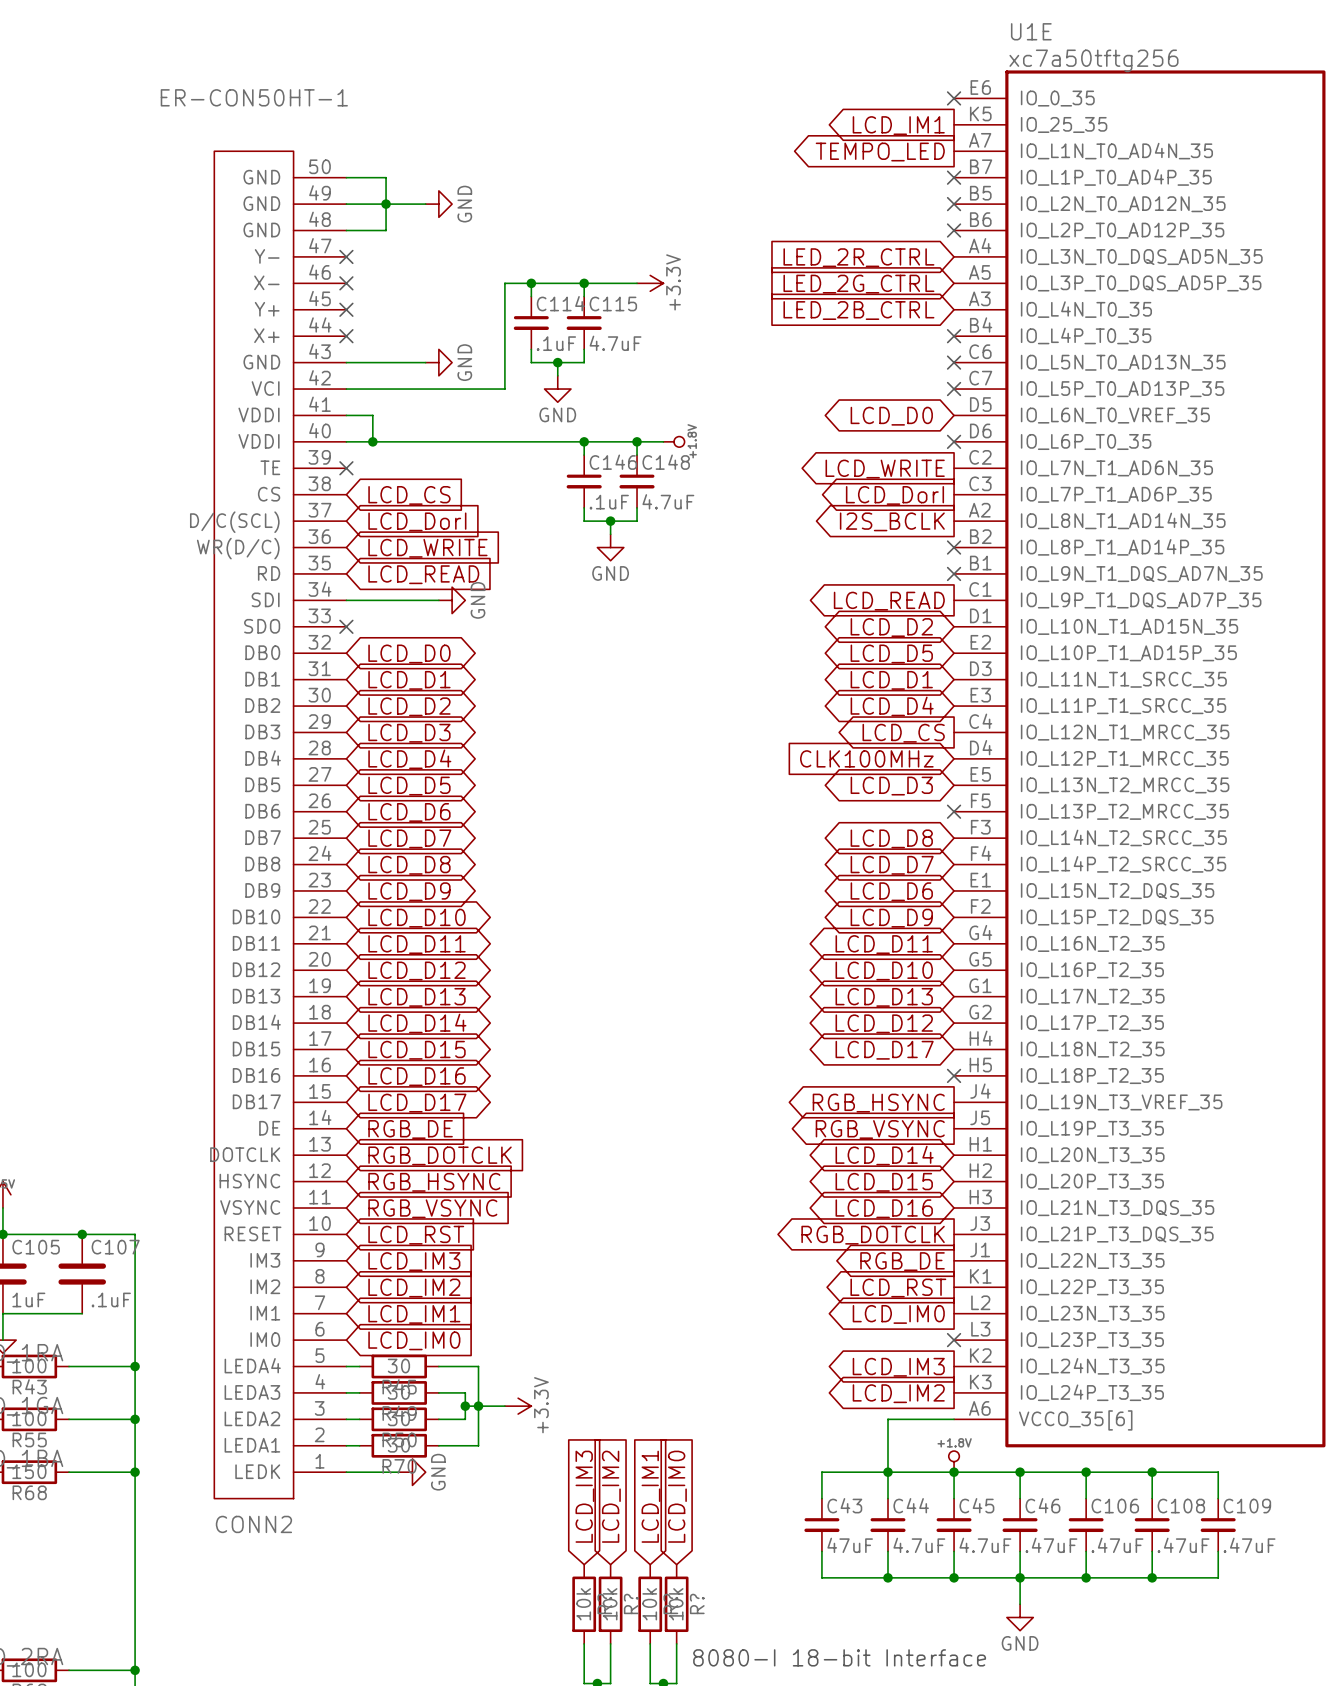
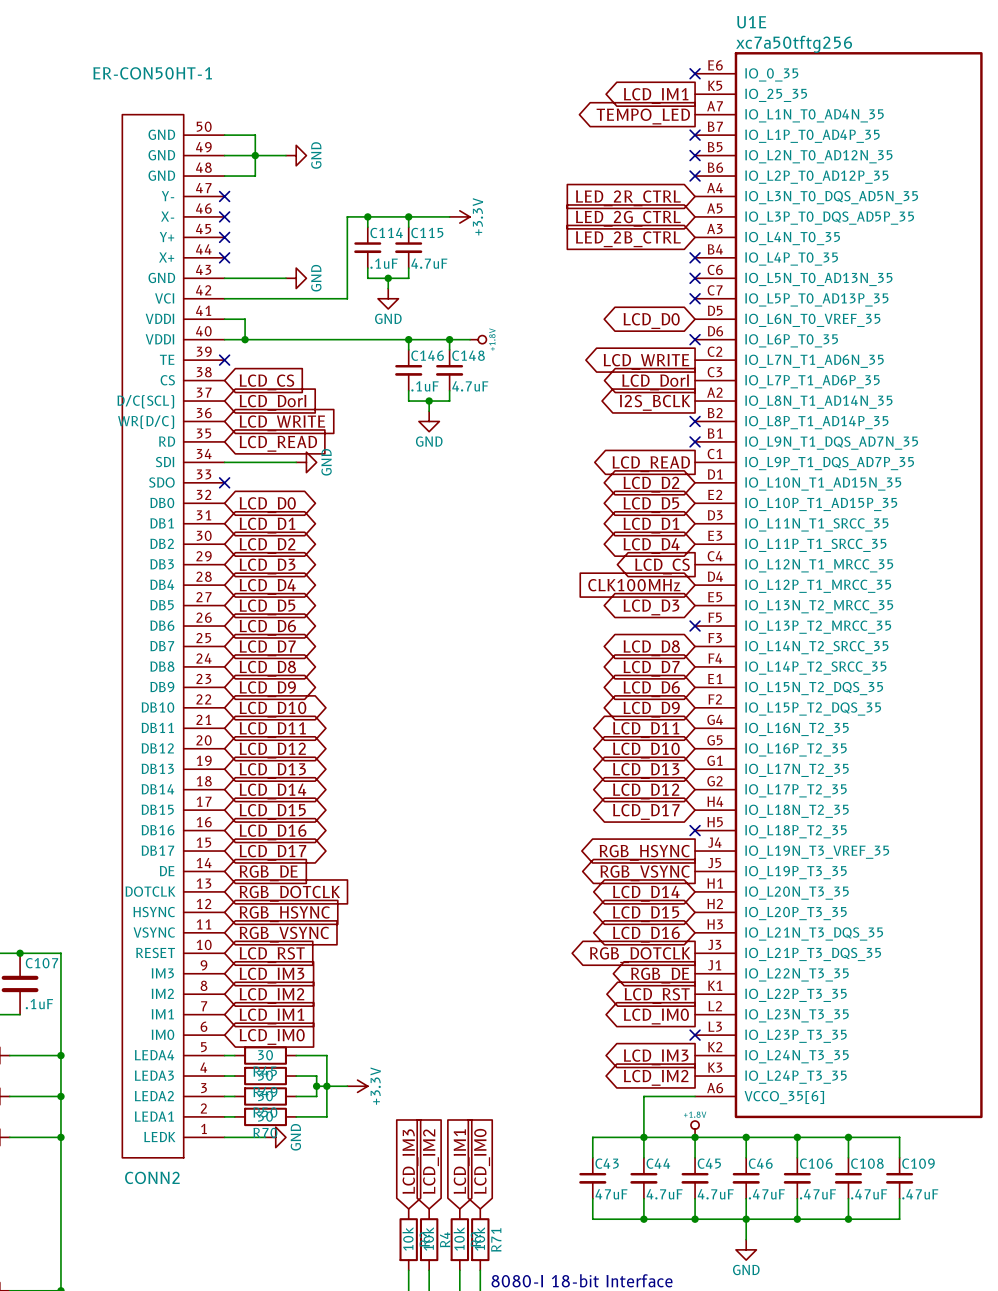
R? name: R? (631, 1603) -> R4 (445, 1239)
R? name: R? (697, 1603) -> R71 (496, 1239)

